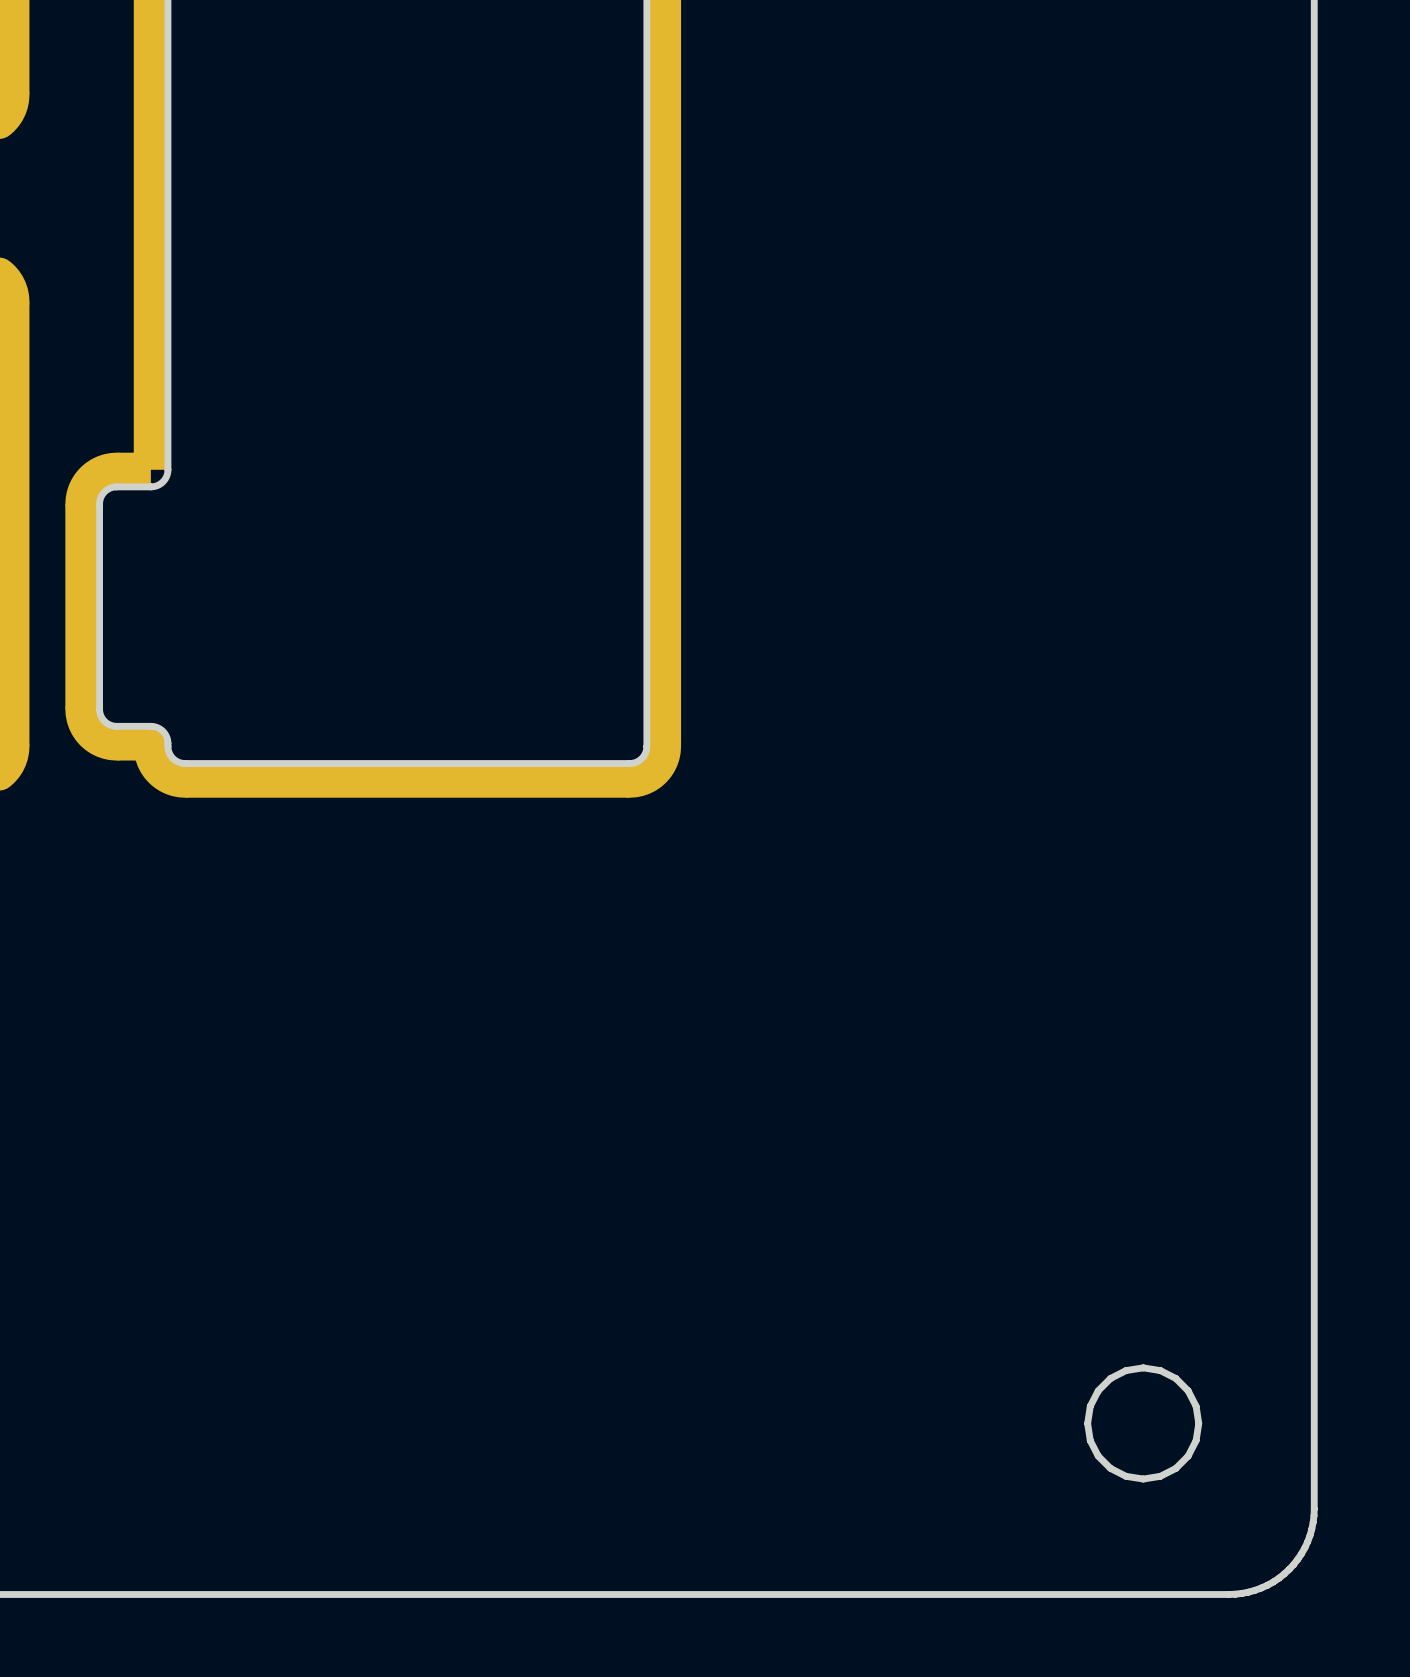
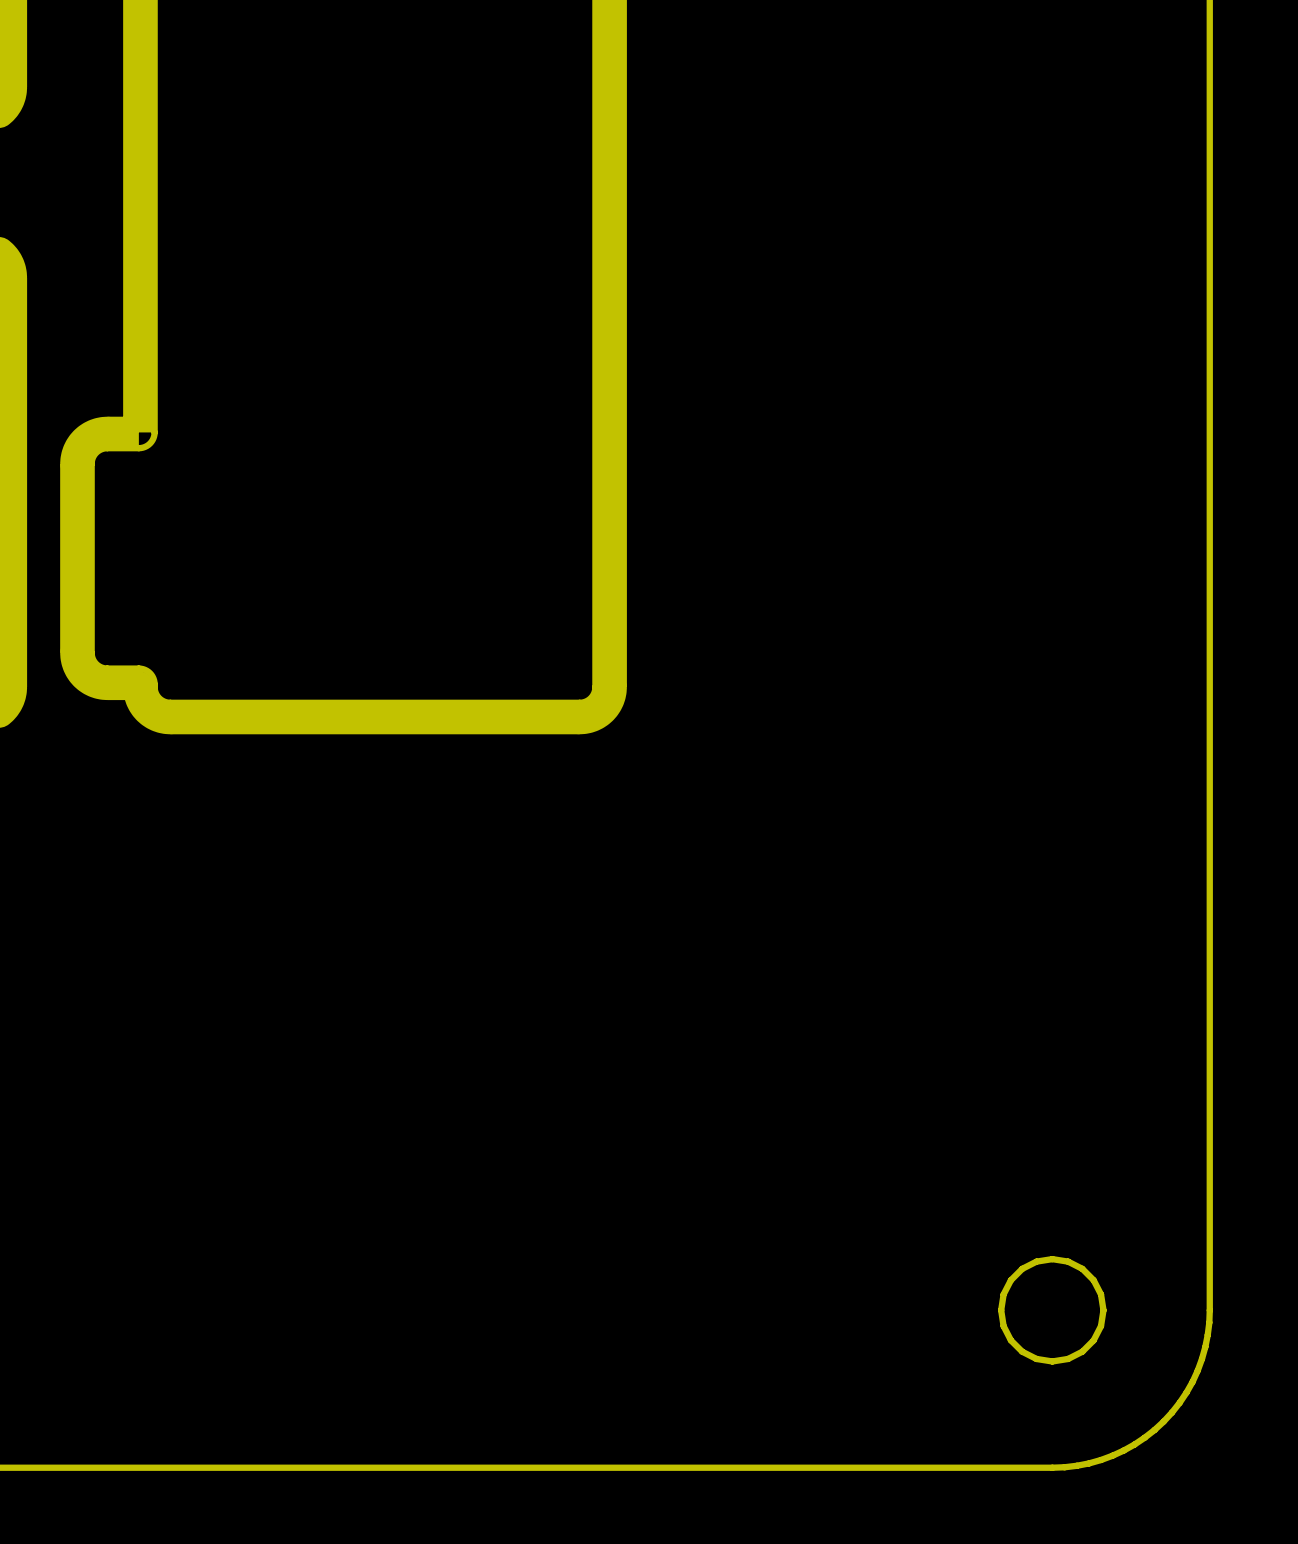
board edge: (1314, 1423) (1313, 1522) (1304, 1547) (1289, 1569) (1267, 1585) (1242, 1593) (1143, 1594) -> (1209, 1310) (1207, 1334) (1197, 1370) (1186, 1392) (1163, 1421) (1134, 1444) (1112, 1455) (1089, 1463) (1052, 1467)

